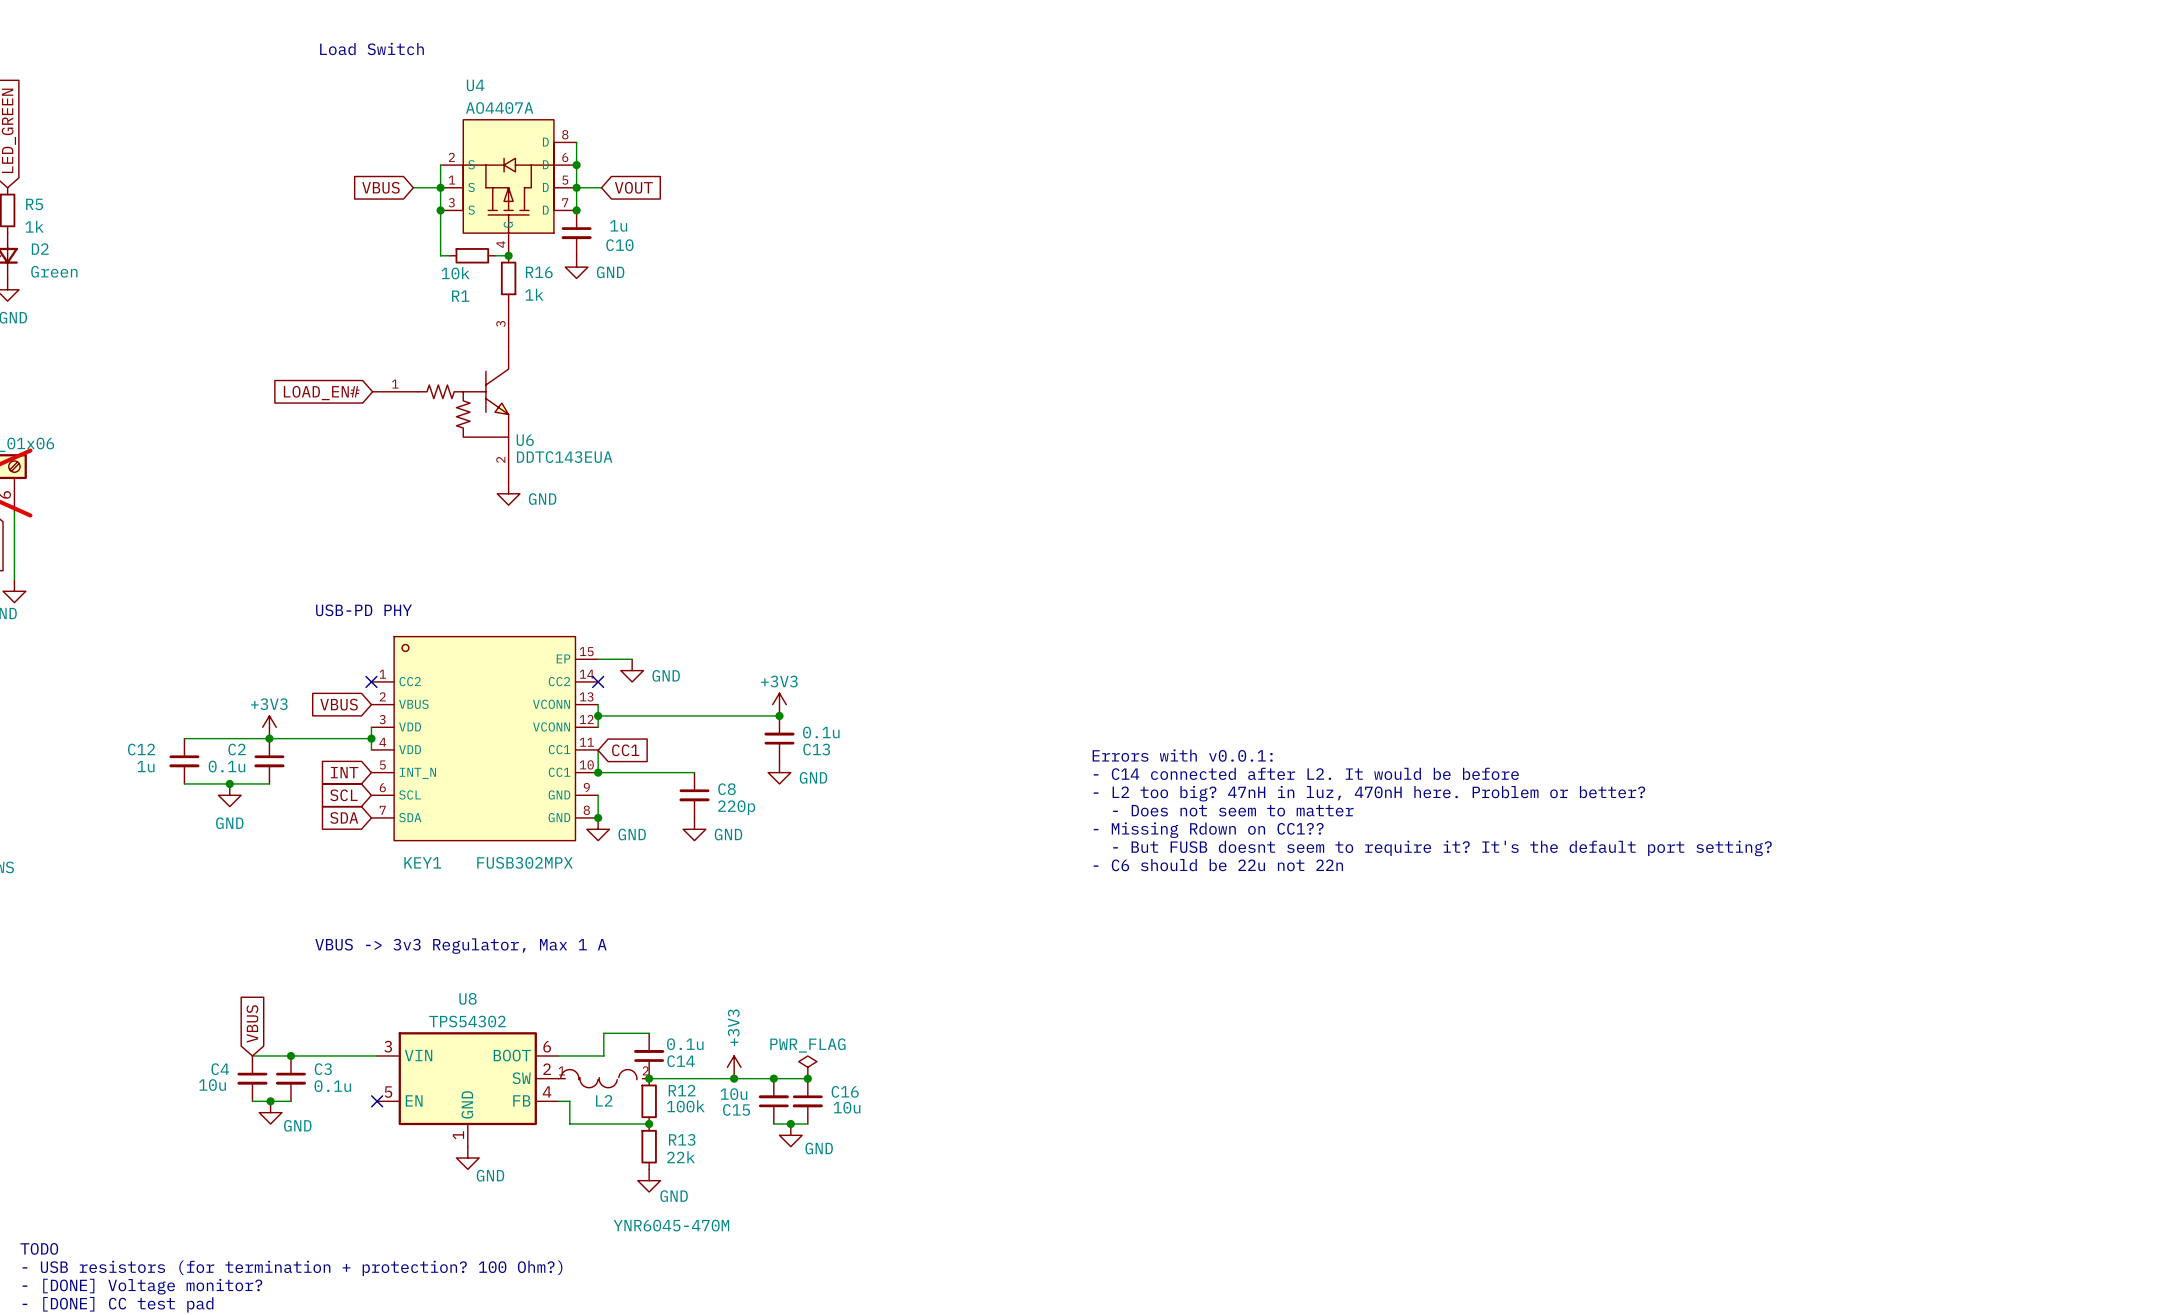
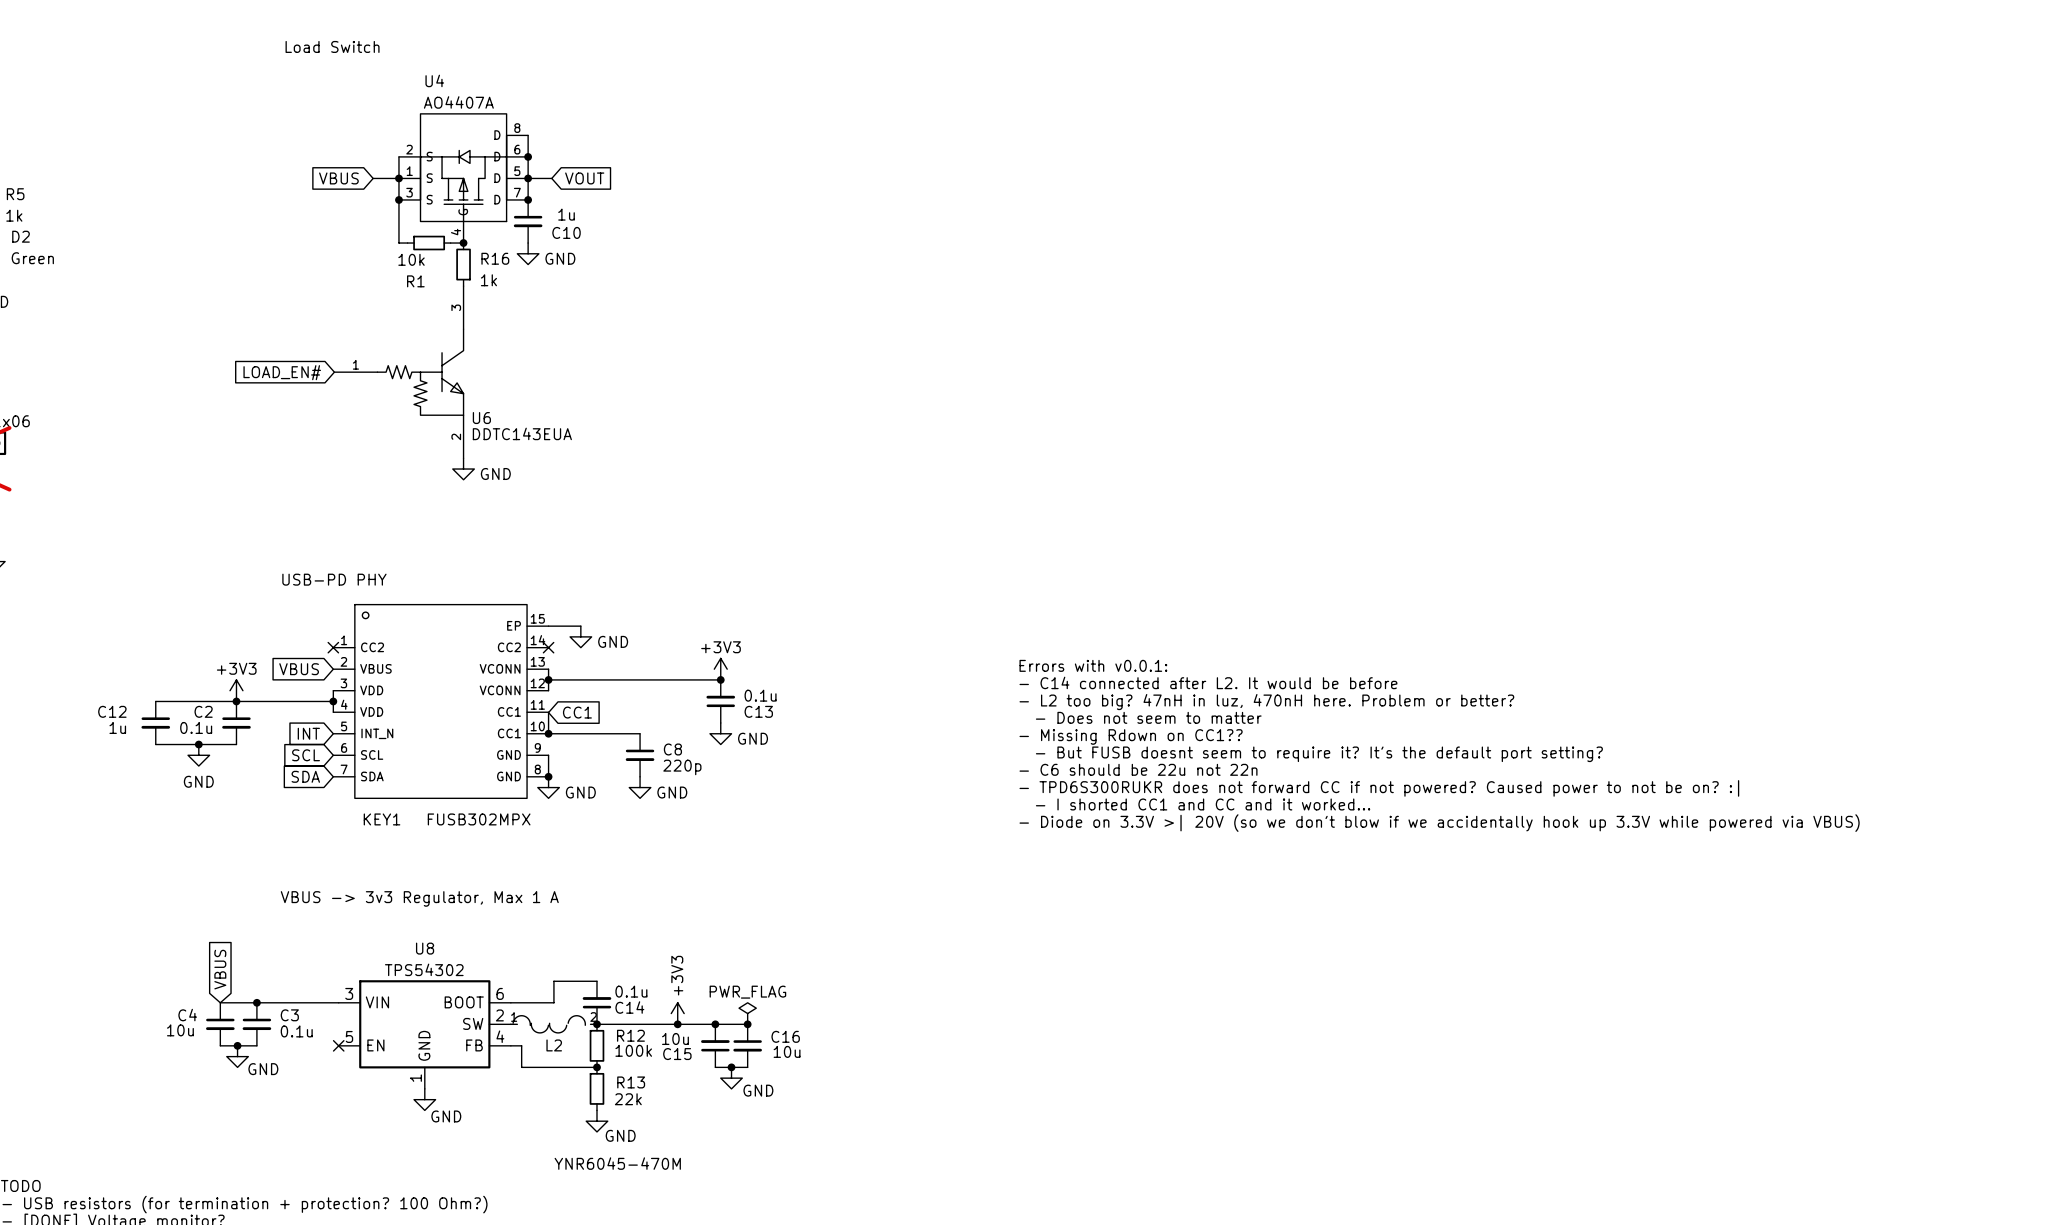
text: none -> Errors with v0.0.1: (1093, 665)
text: none -> - C14 connected after L2. It would be before (1208, 682)
text: none -> - L2 too big? 47nH in luz, 470nH here. Problem or better? (1266, 702)
text: Errors with v0.0.1: (1182, 755) -> - Does not seem to matter (1148, 717)
text: - C14 connected after L2. It would be before (1306, 773) -> - Missing Rdown on CC1?? (1131, 736)
text: - L2 too big? 47nH in luz, 470nH here. Problem or better? (1369, 793) -> - But FUSB doesnt seem to require it? It's the default port setting? (1319, 754)
text: - Does not seem to matter (1233, 810) -> - C6 should be 22u not 22n (1138, 769)
text: - Missing Rdown on CC1?? (1208, 830) -> - TPD6S300RUKR does not forward CC if not powered? Caused power to not be on? :| (1379, 788)
text: - But FUSB doesnt seem to require it? It's the default port setting? (1442, 848) -> - I shorted CC1 and CC and it worked... (1203, 804)
text: - C6 should be 22u not 22n (1218, 865) -> - Diode on 3.3V >| 20V (so we don't blow if we accidentally hook up 3.3V while powered via VBUS) (1439, 823)

